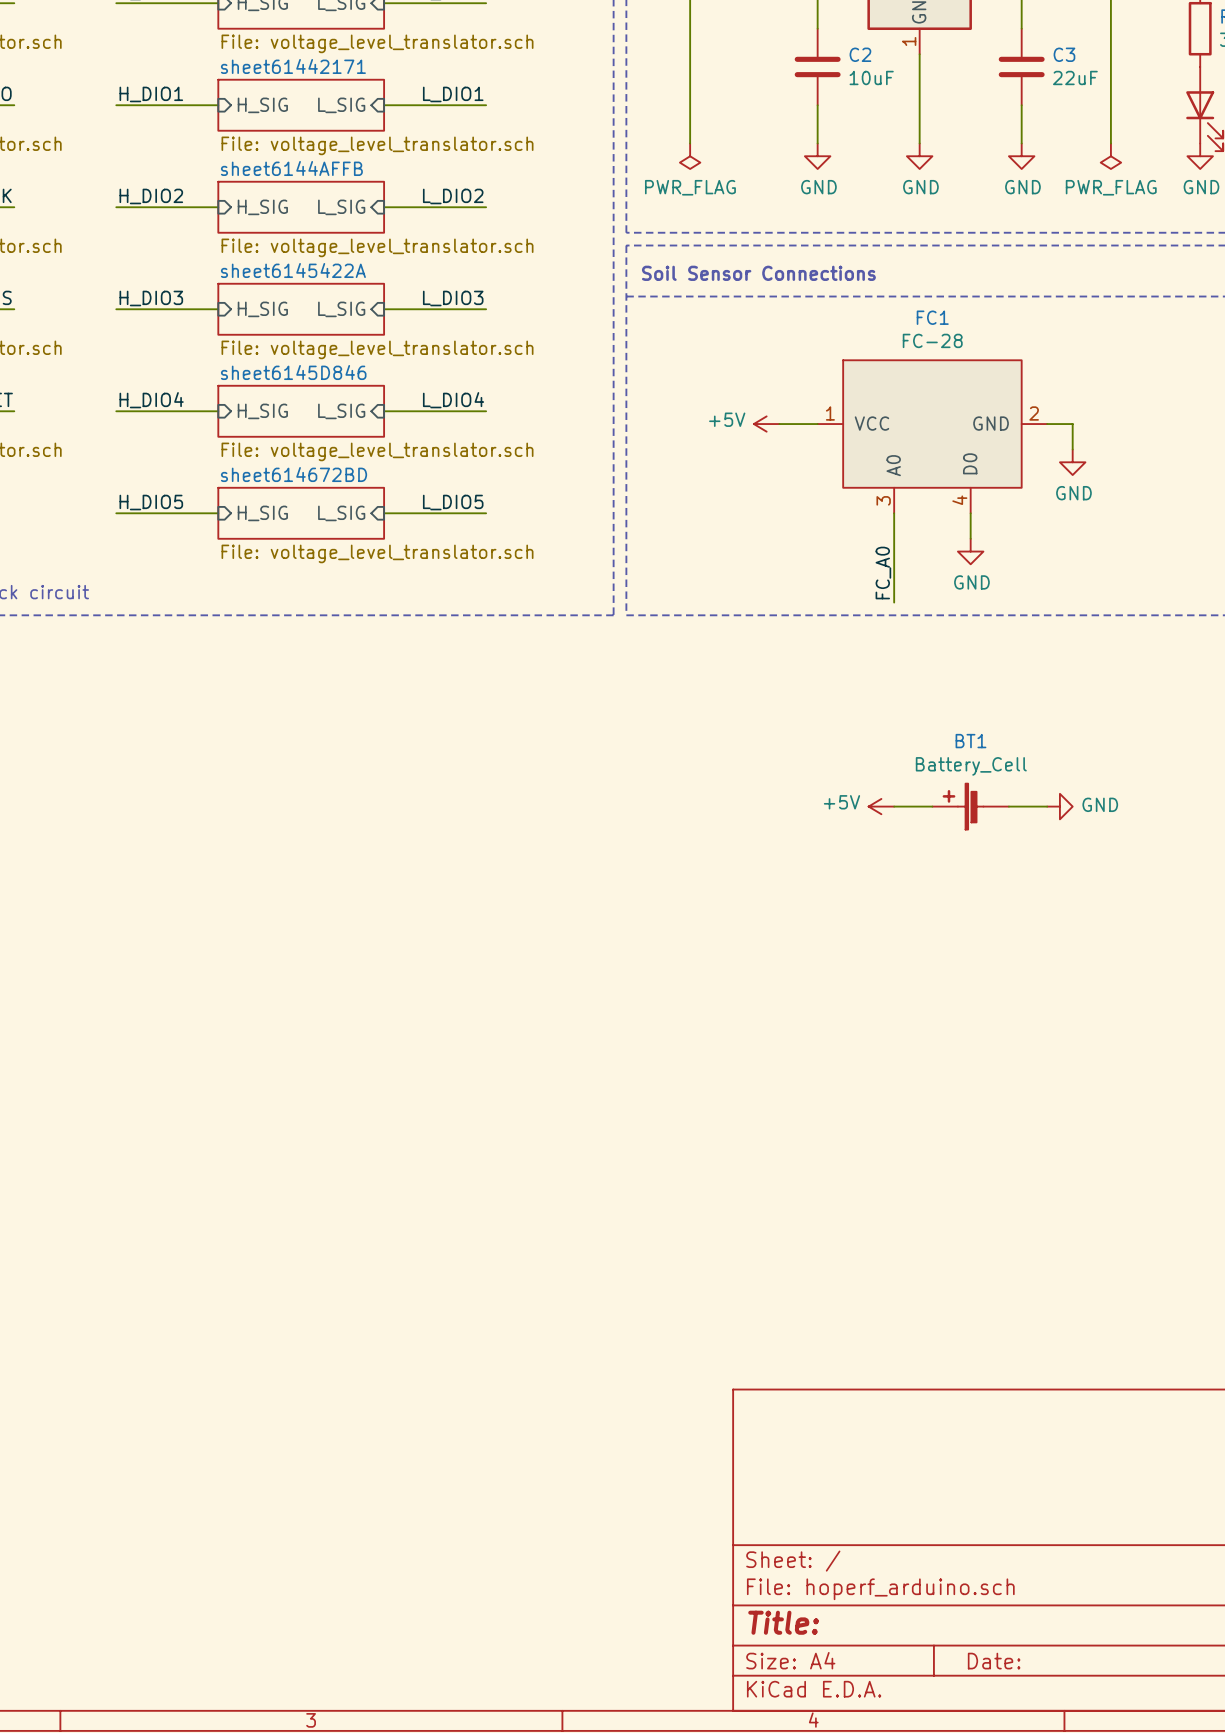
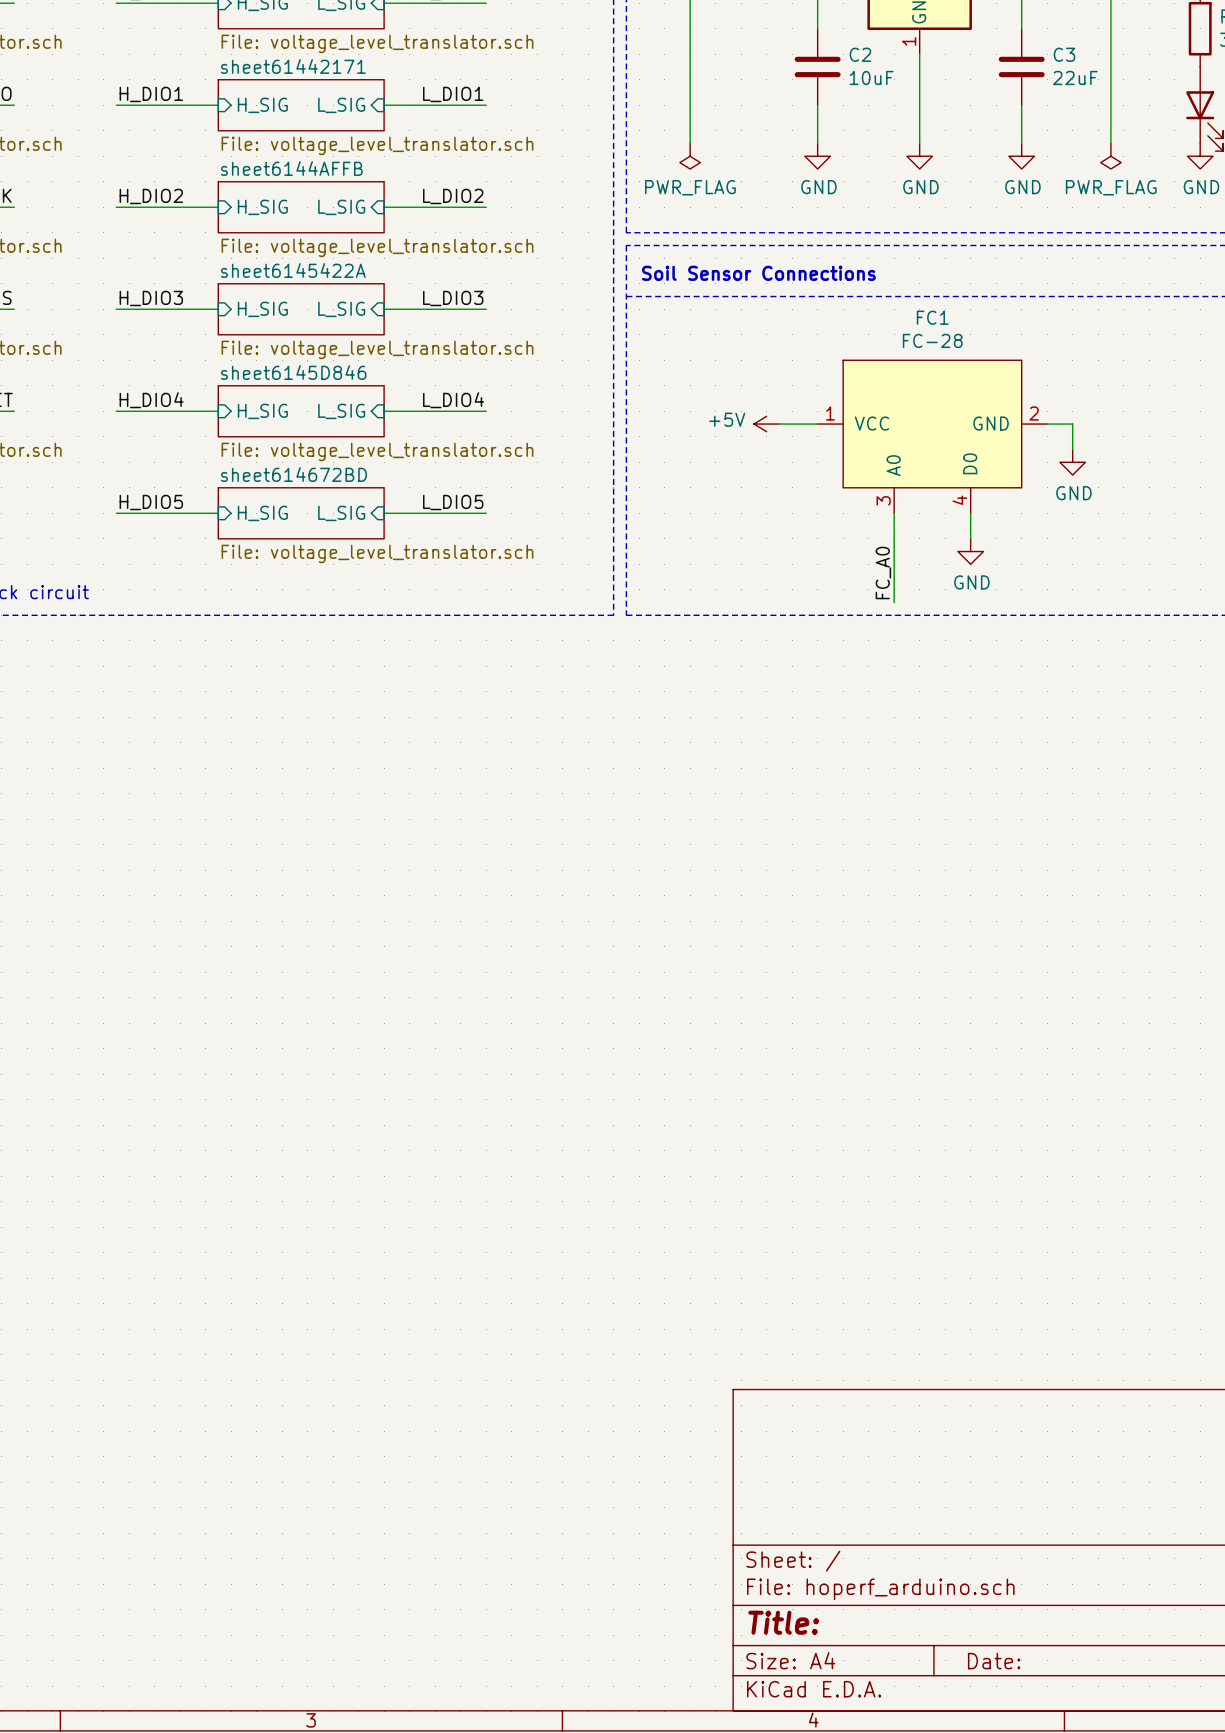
power symbol: +5V (881, 806) -> none
wire: (894, 806) (932, 806) -> none
BT1: Battery_Cell (970, 806) -> none
wire: (1008, 806) (1047, 806) -> none
power symbol: GND (1059, 806) -> none

